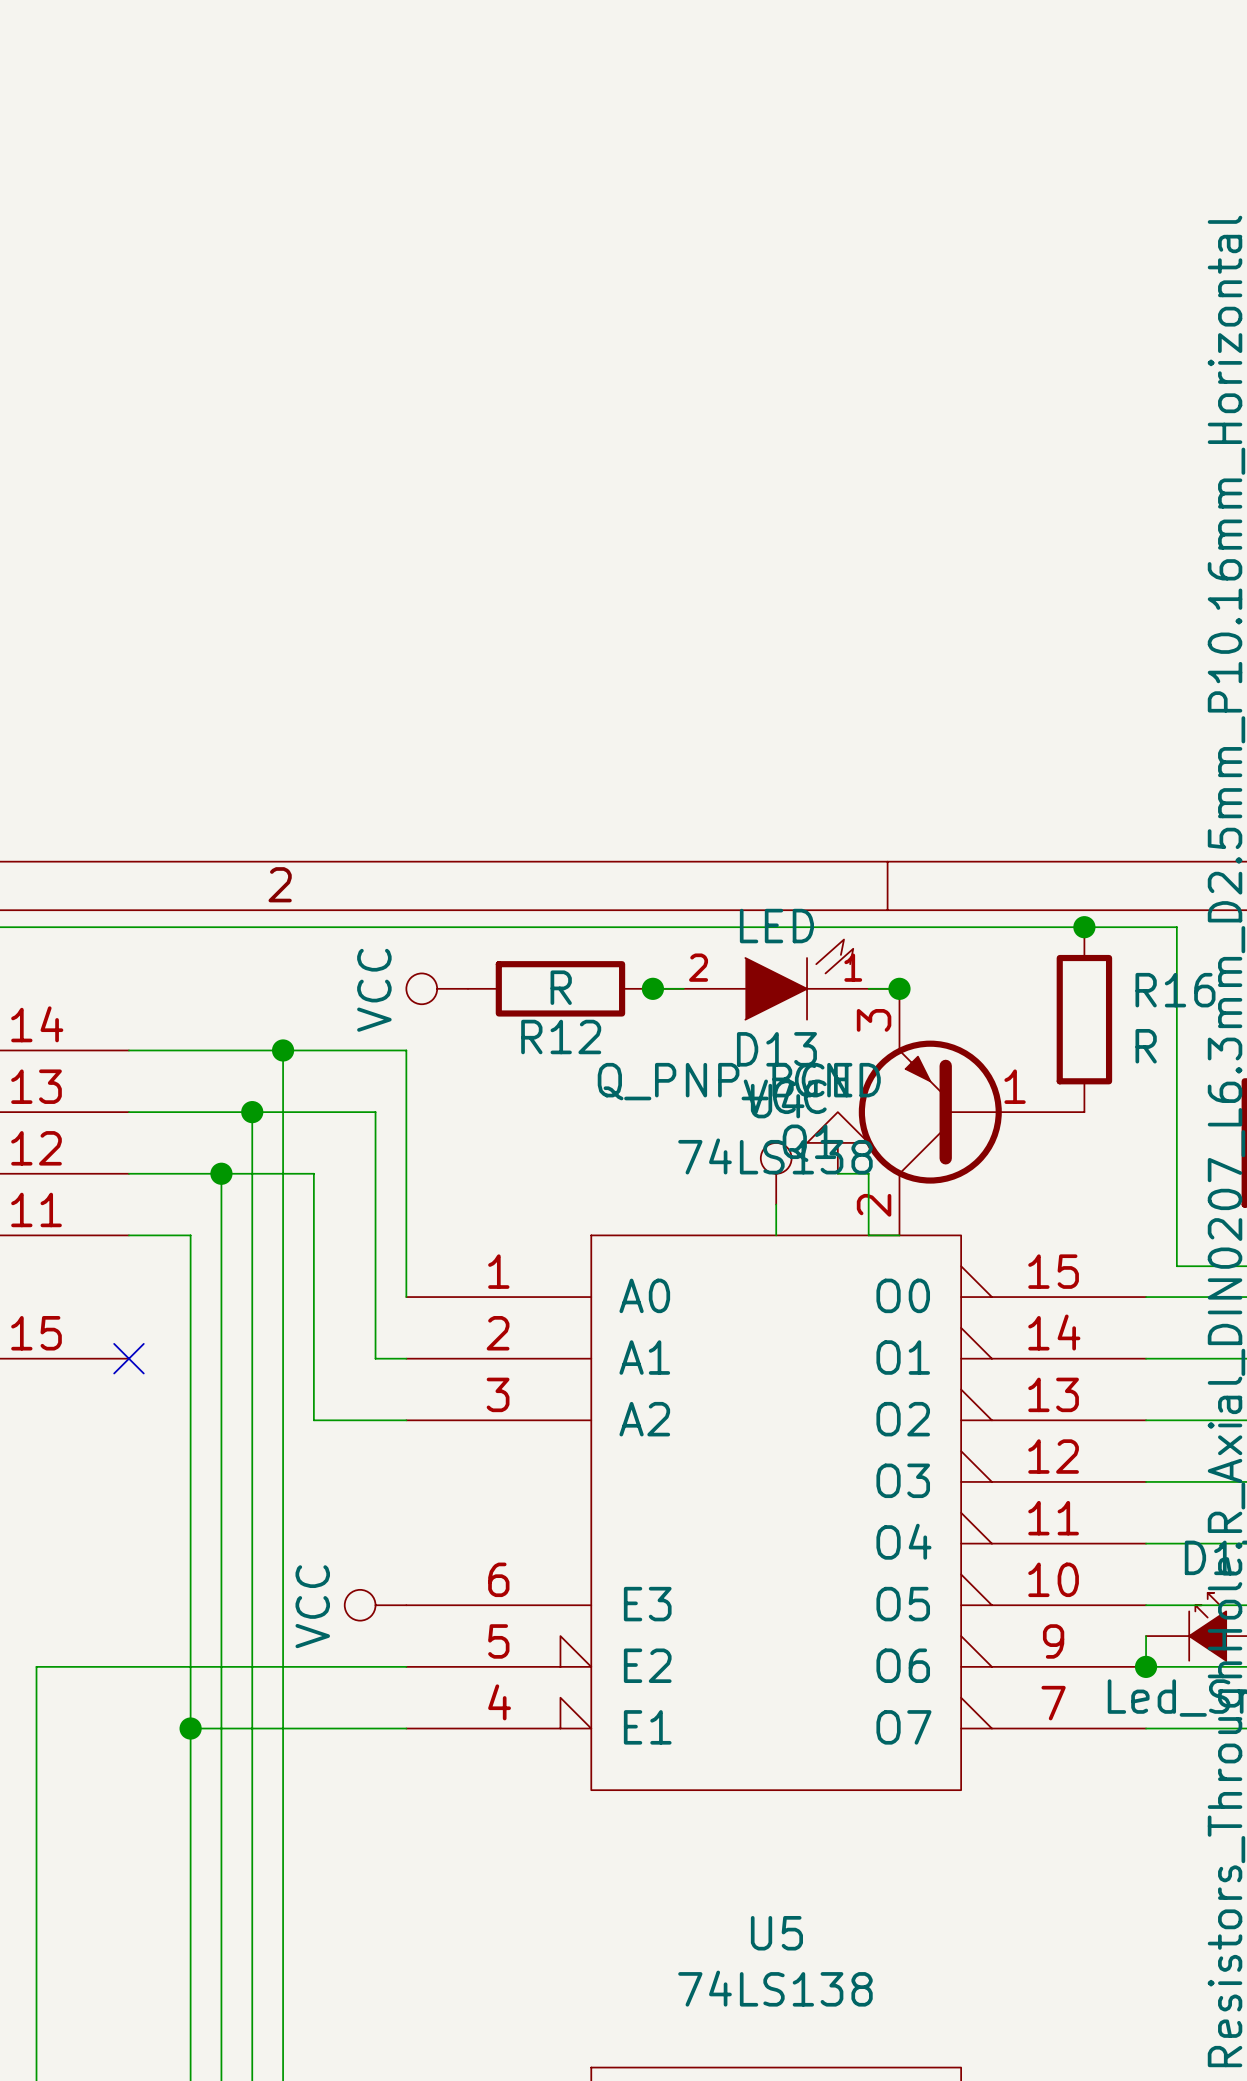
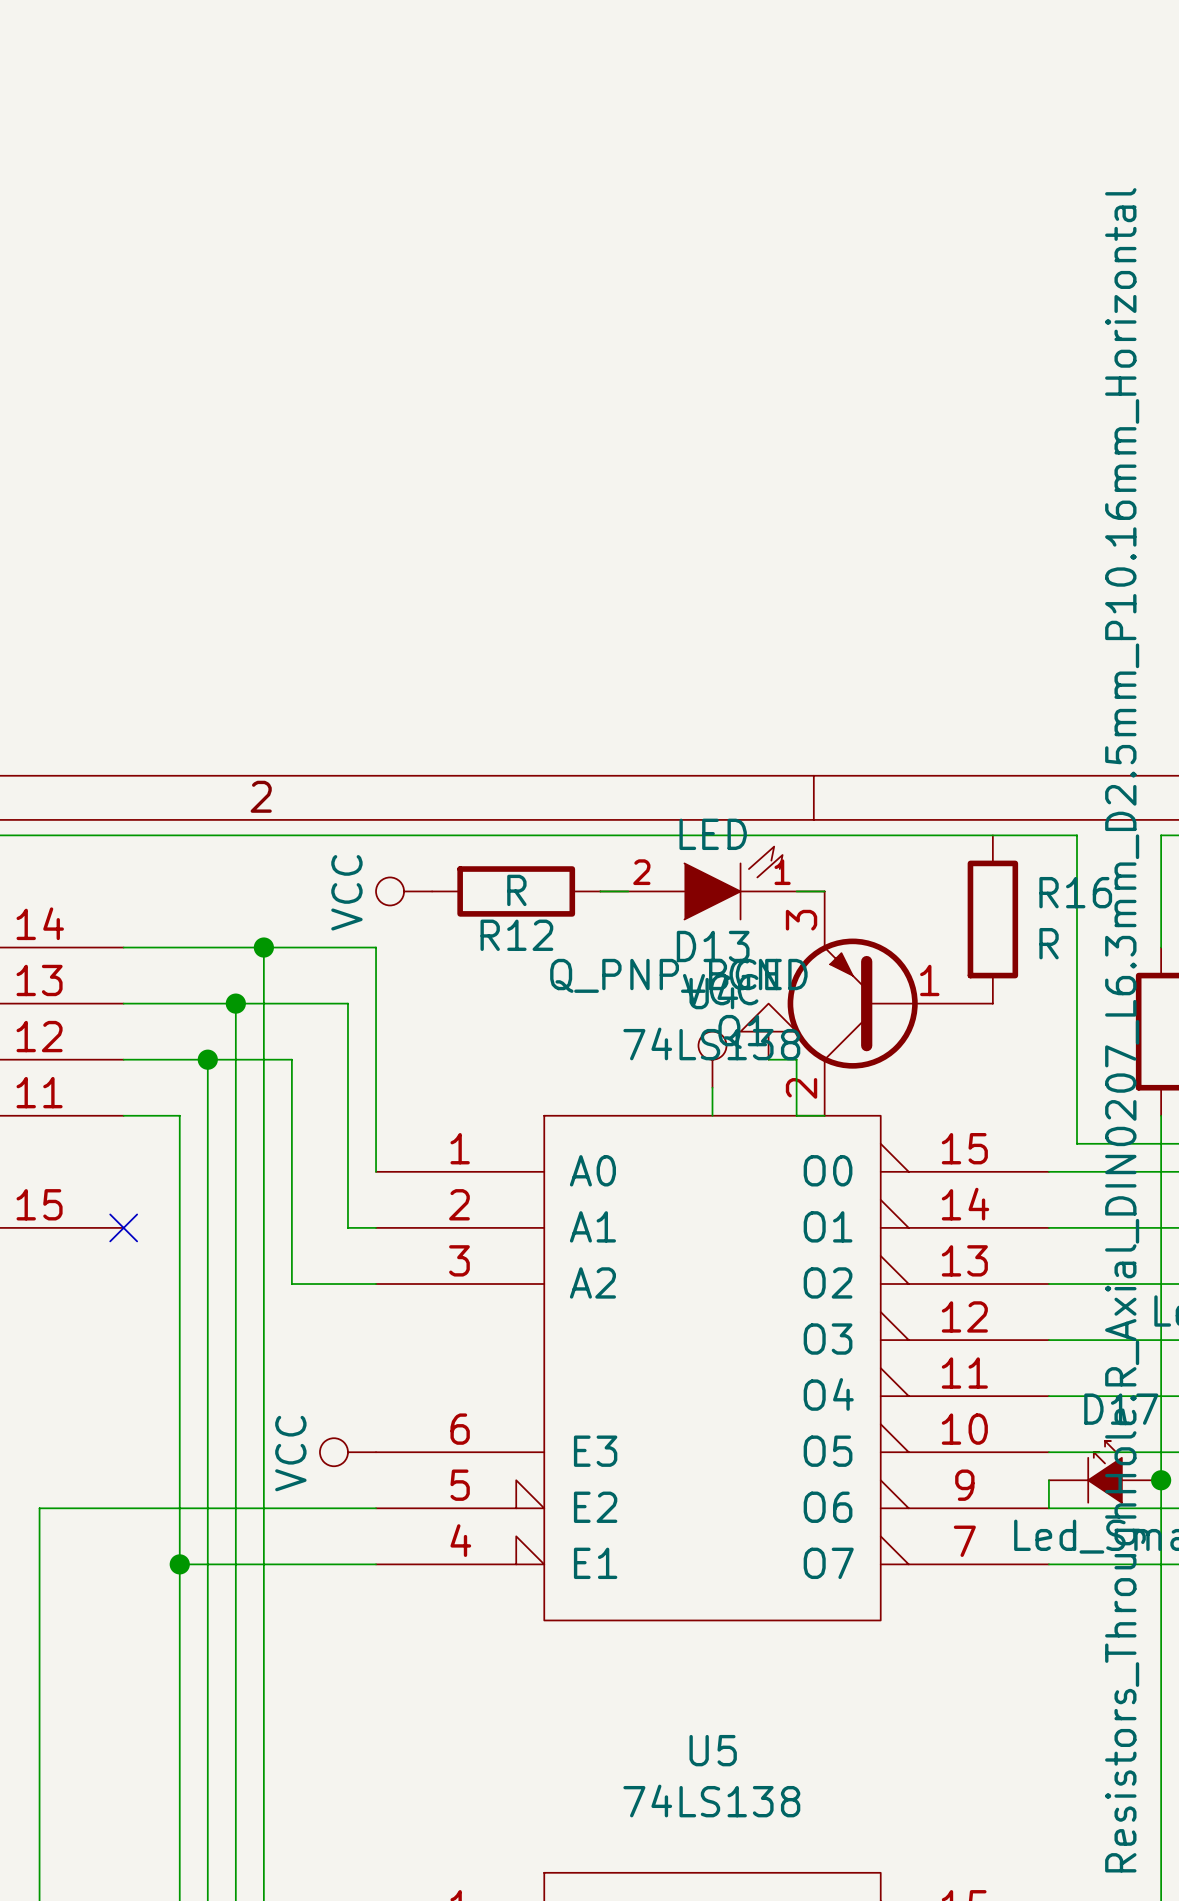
junction: (1084, 927) -> none
junction: (652, 988) -> none
junction: (899, 988) -> none
junction: (1146, 1666) -> none

